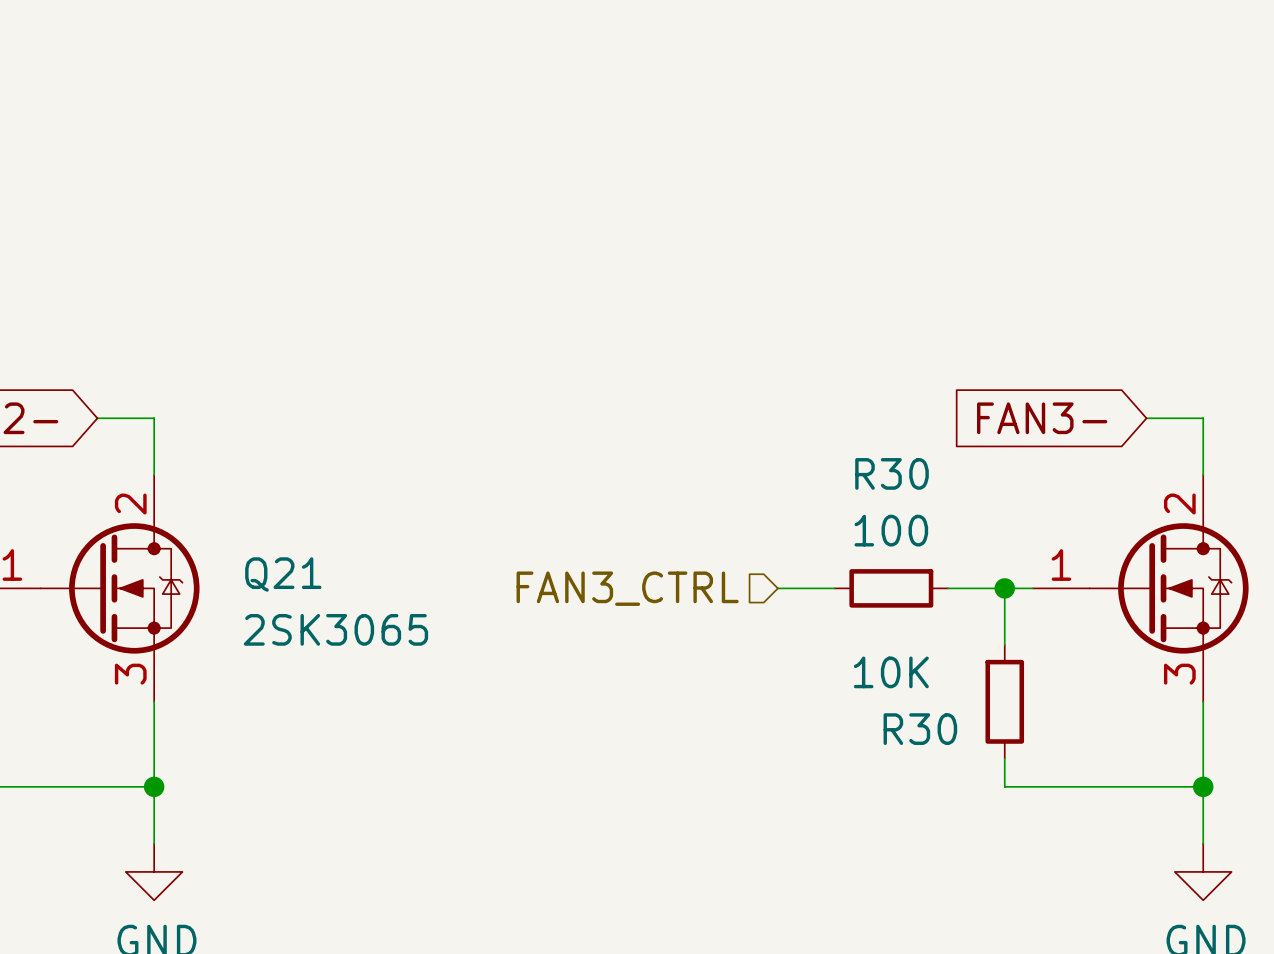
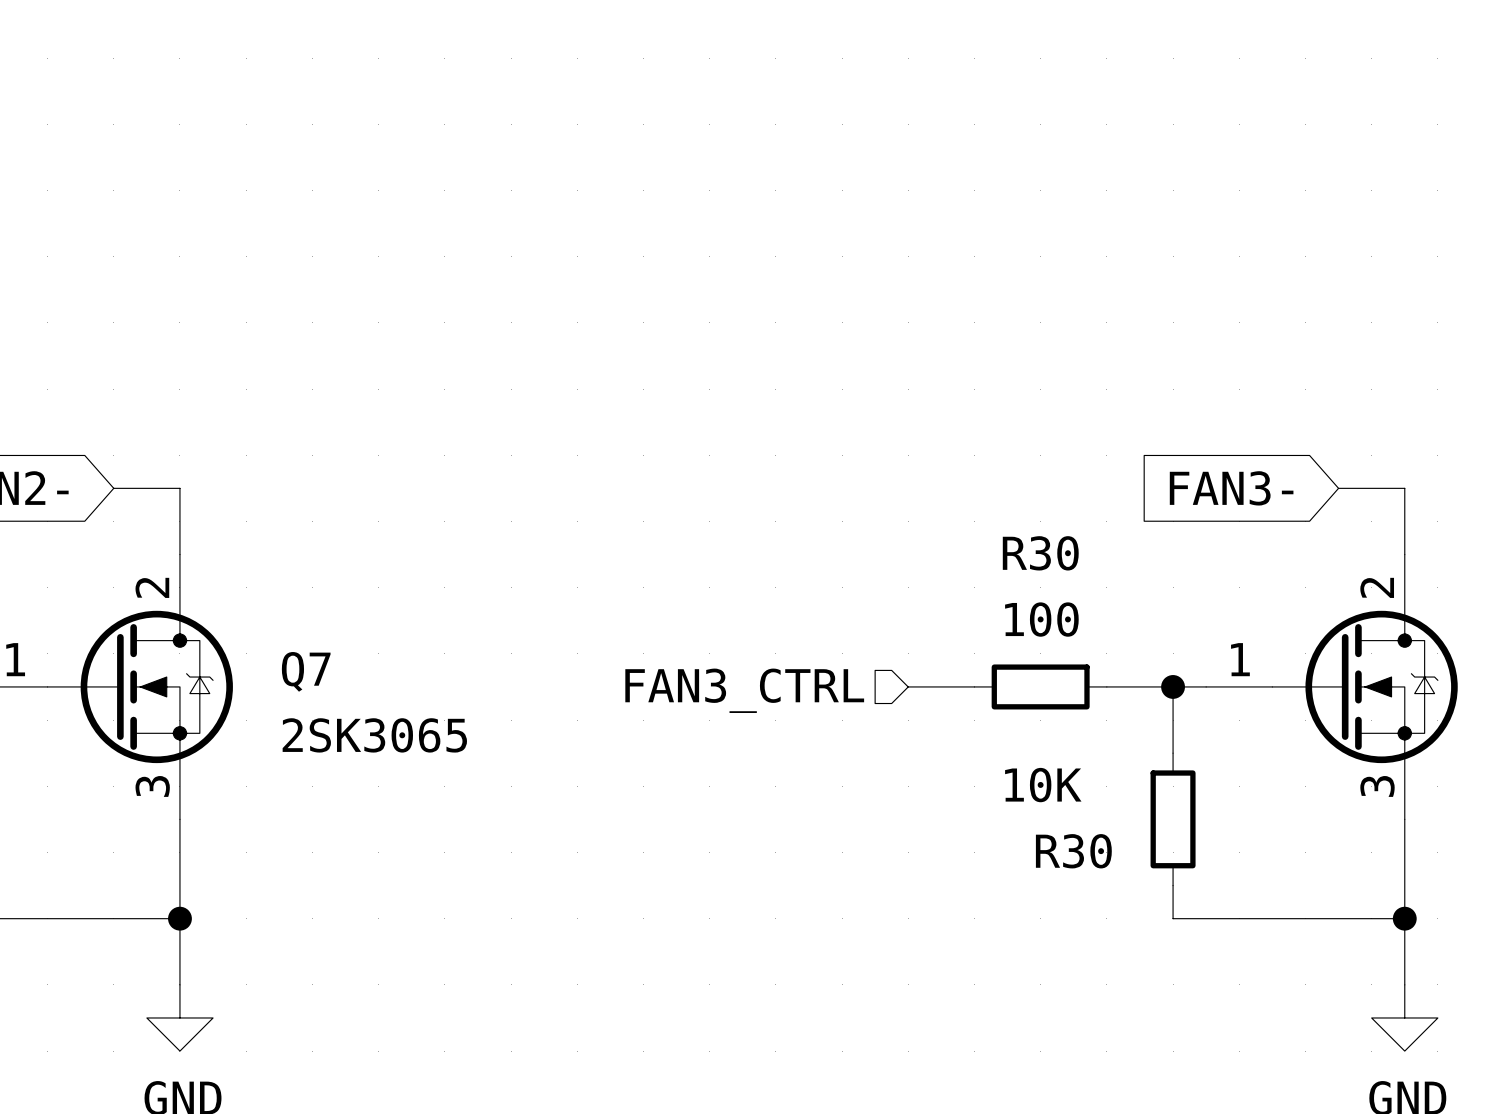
Q21 name: Q21 (283, 574) -> Q7 (306, 671)

